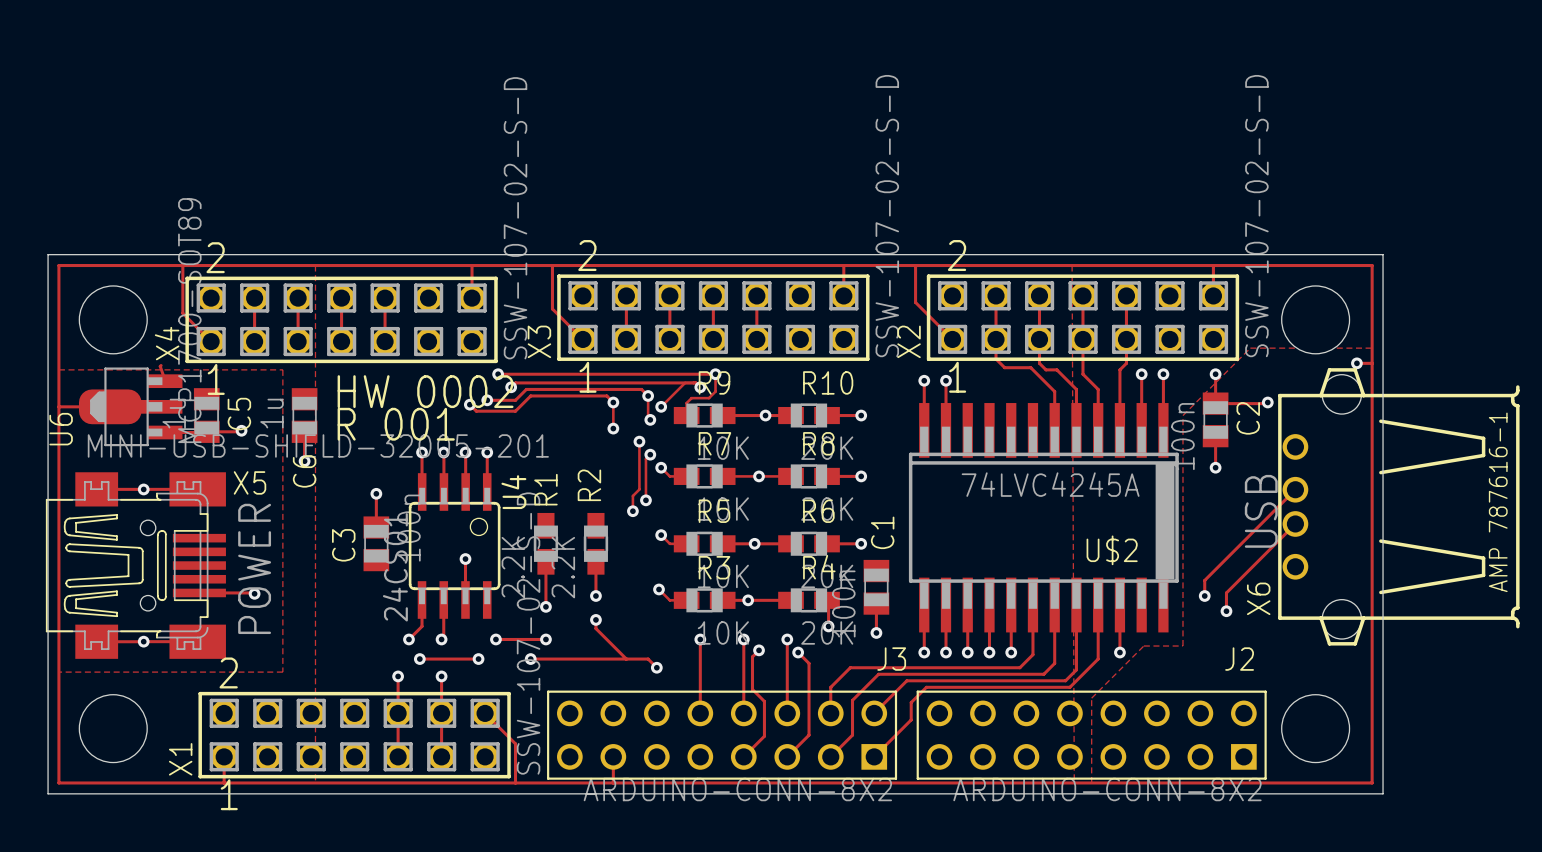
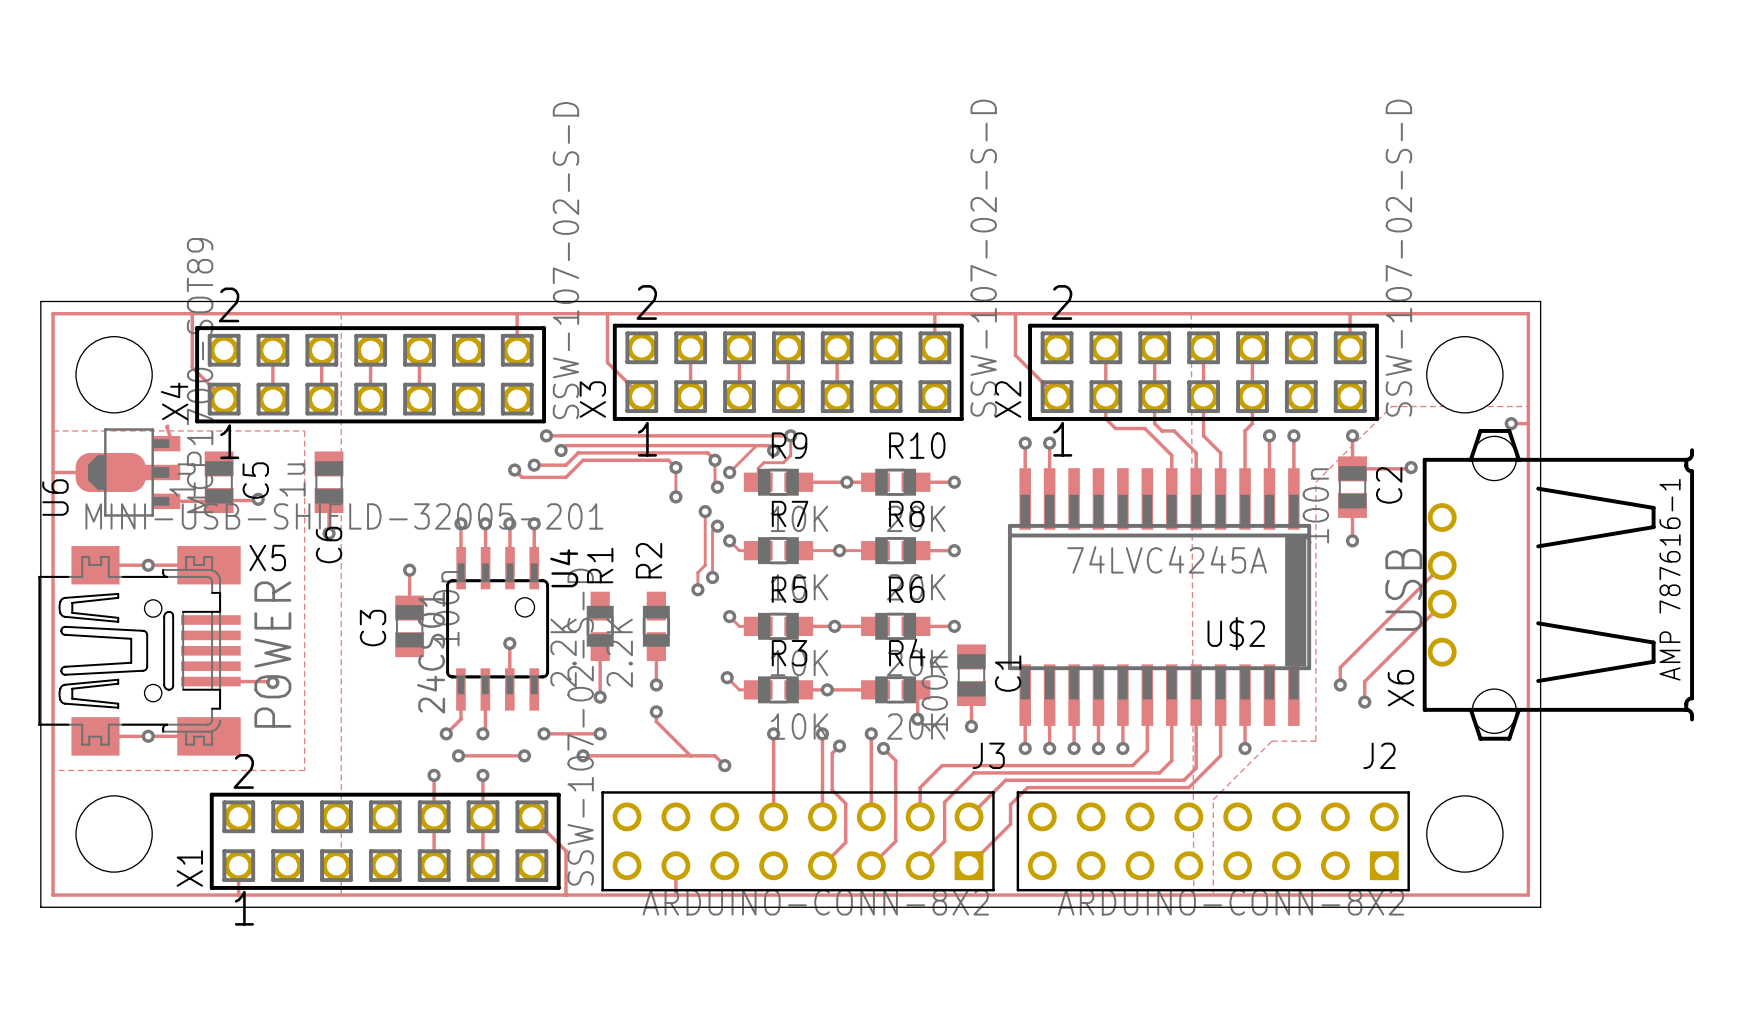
U6 footprint: [78, 367, 183, 447] -> [75, 428, 181, 517]
text: HW 0002 (425, 391) -> none
text: R 001 (396, 424) -> none
C1 name position: C1 (882, 532) -> C1 (1008, 673)

